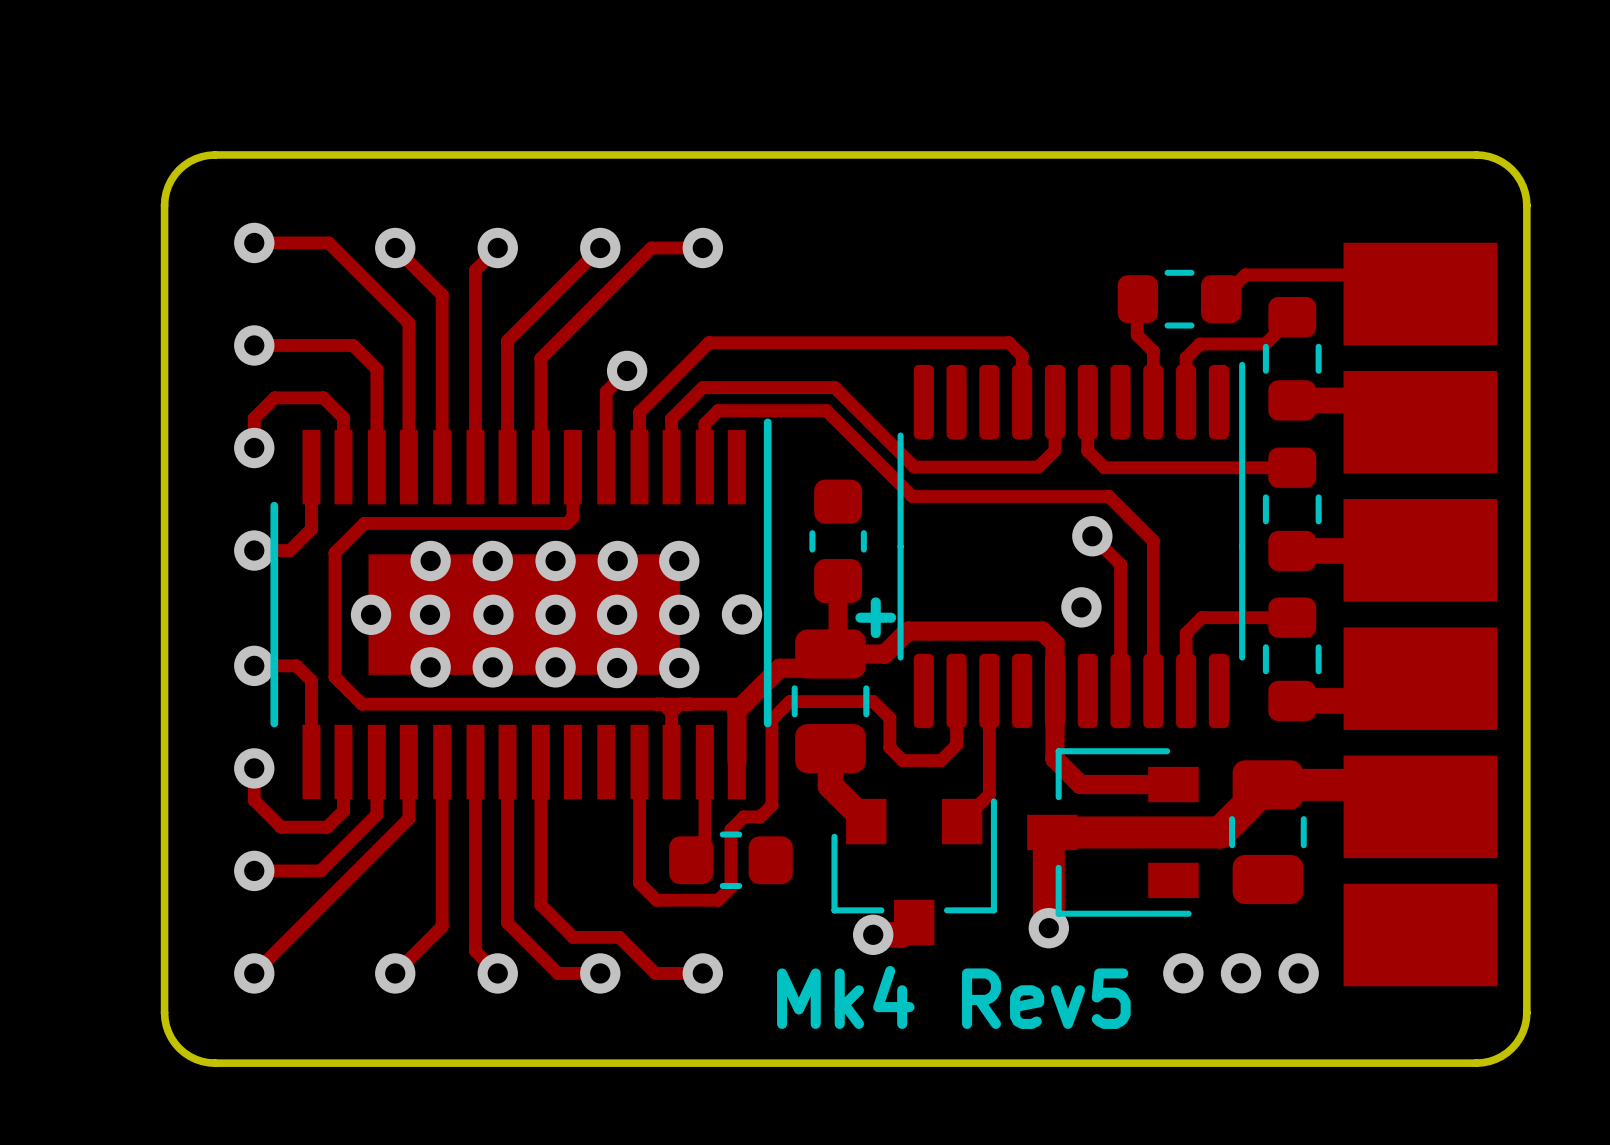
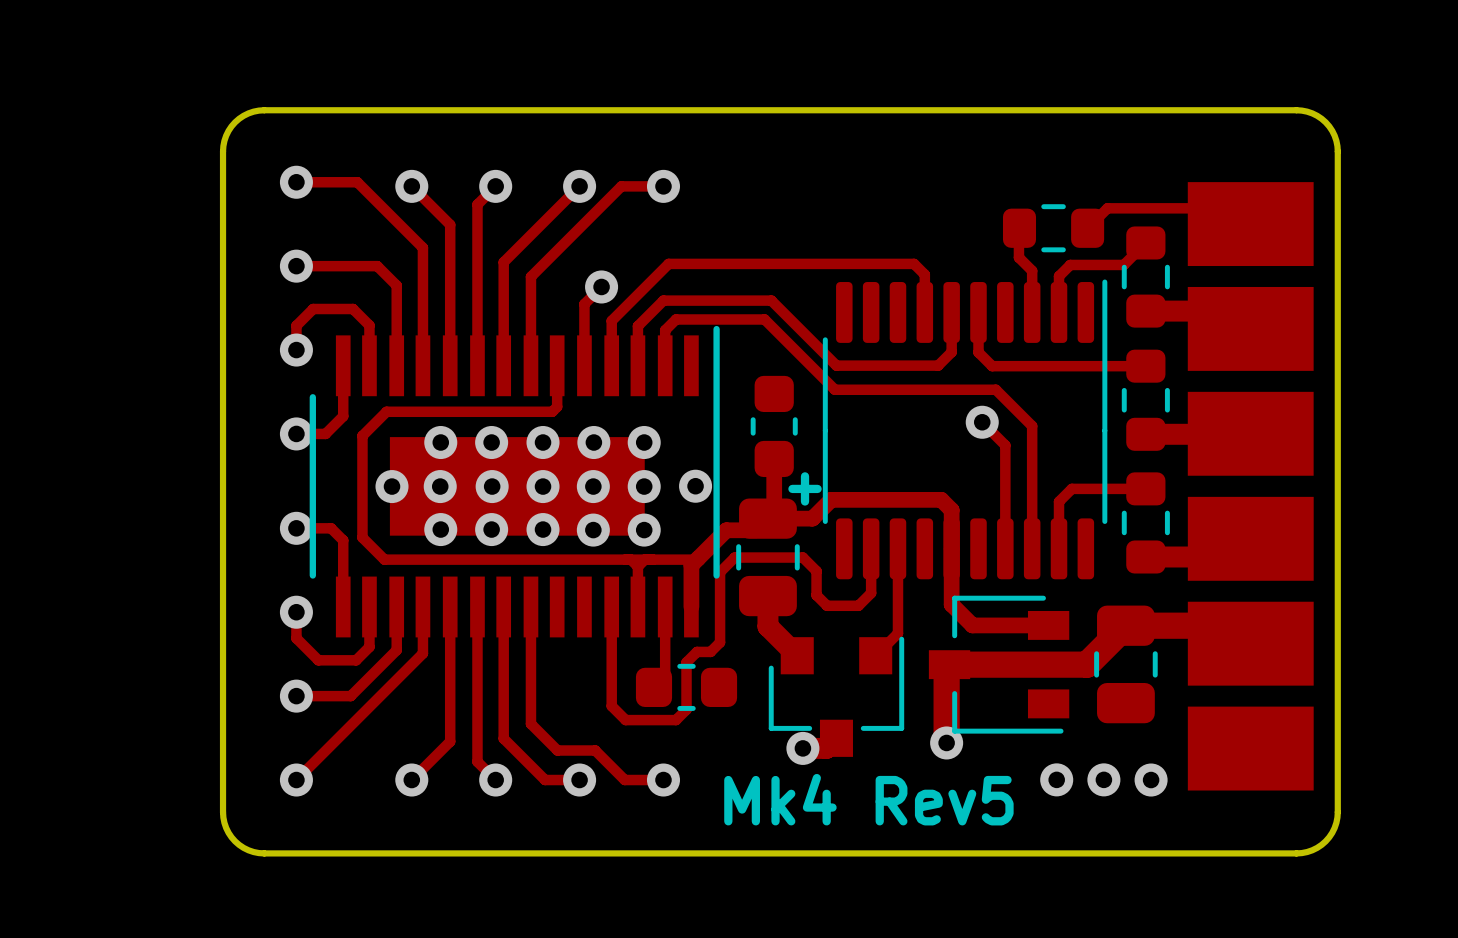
via: (1081, 607) -> none

